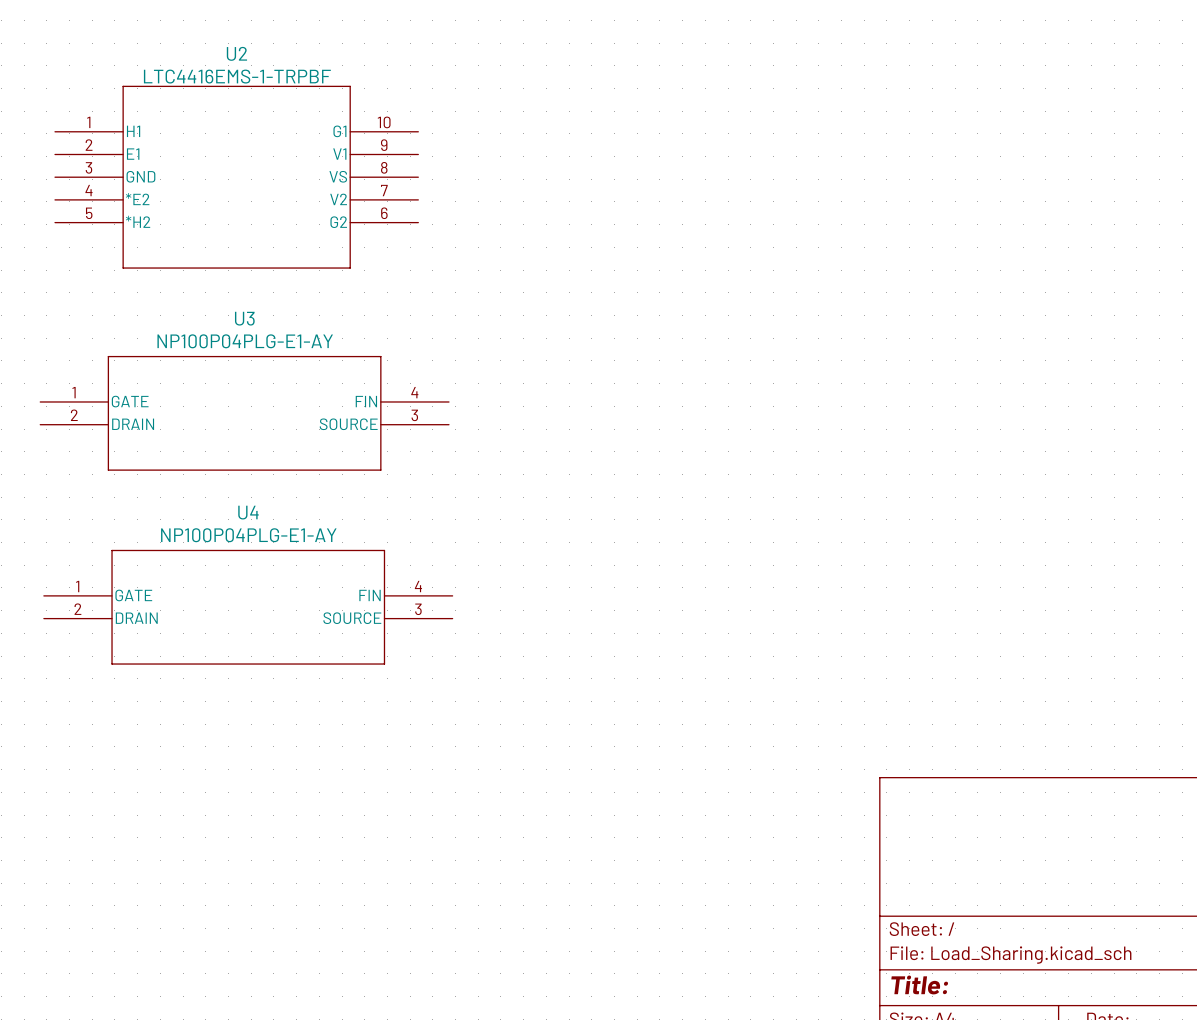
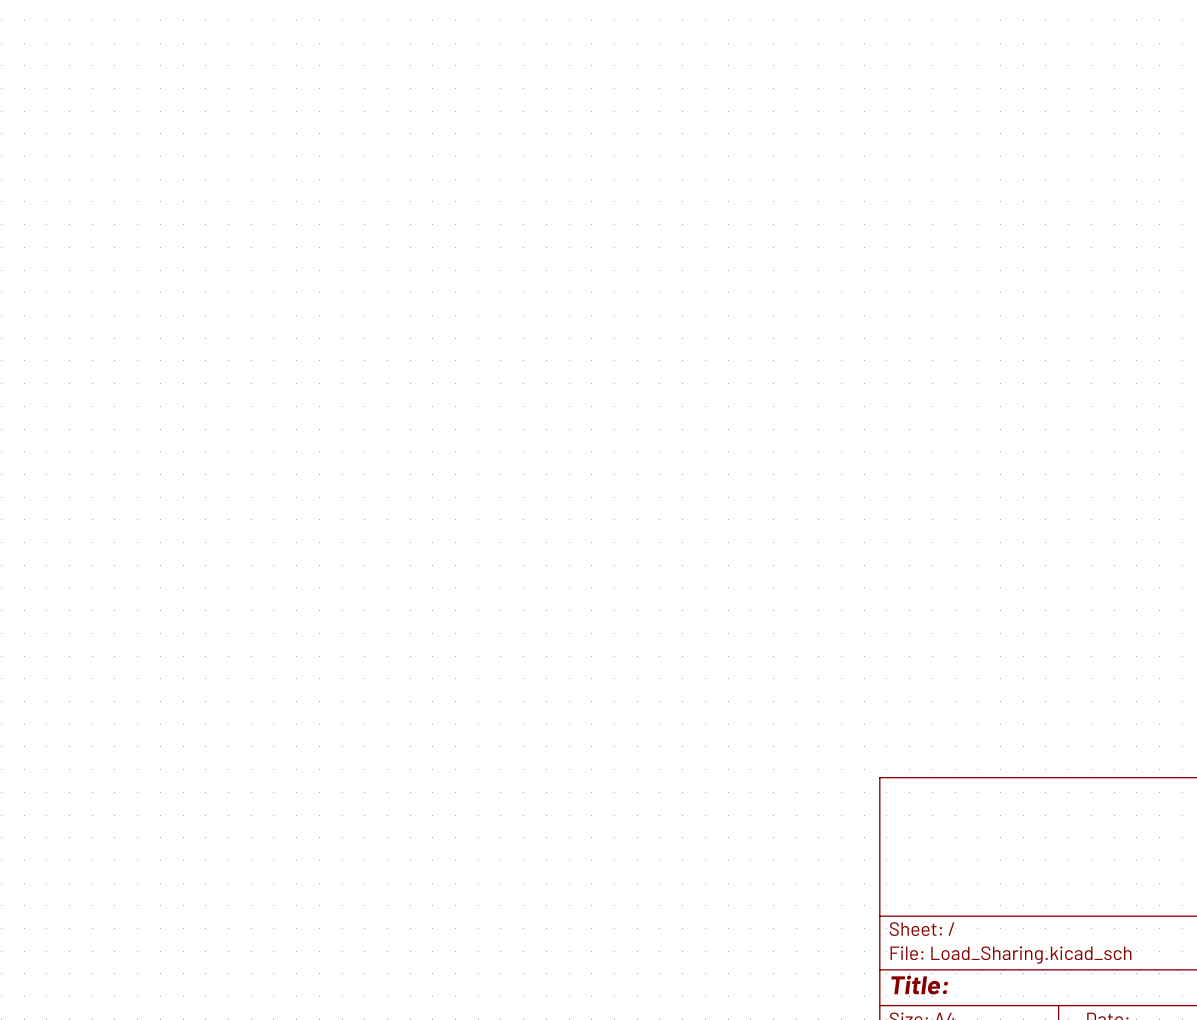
U2: LTC4416EMS-1-TRPBF (236, 177) -> none
U3: NP100P04PLG-E1-AY (244, 413) -> none
U4: NP100P04PLG-E1-AY (248, 607) -> none

